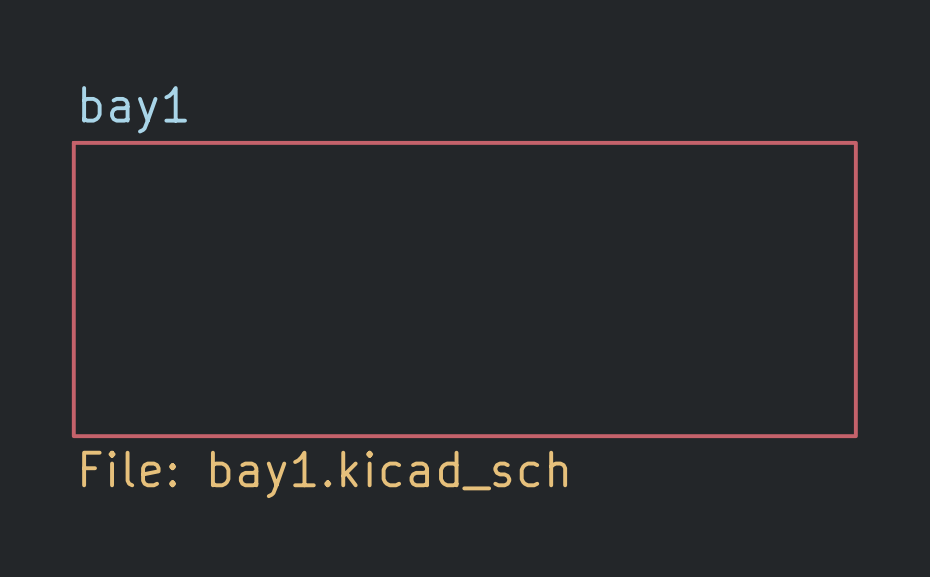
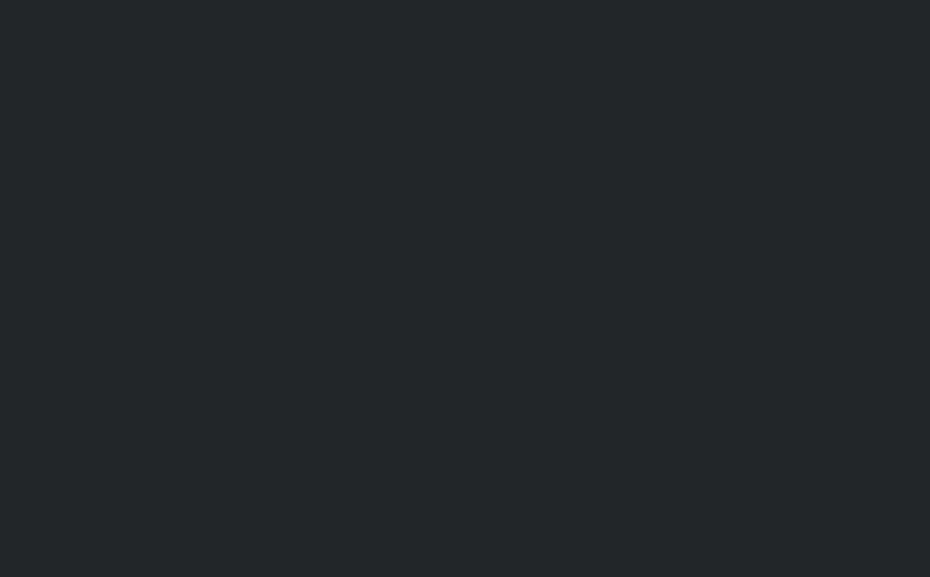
sheet bay1: File: bay1.kicad_sch (464, 289) -> none

